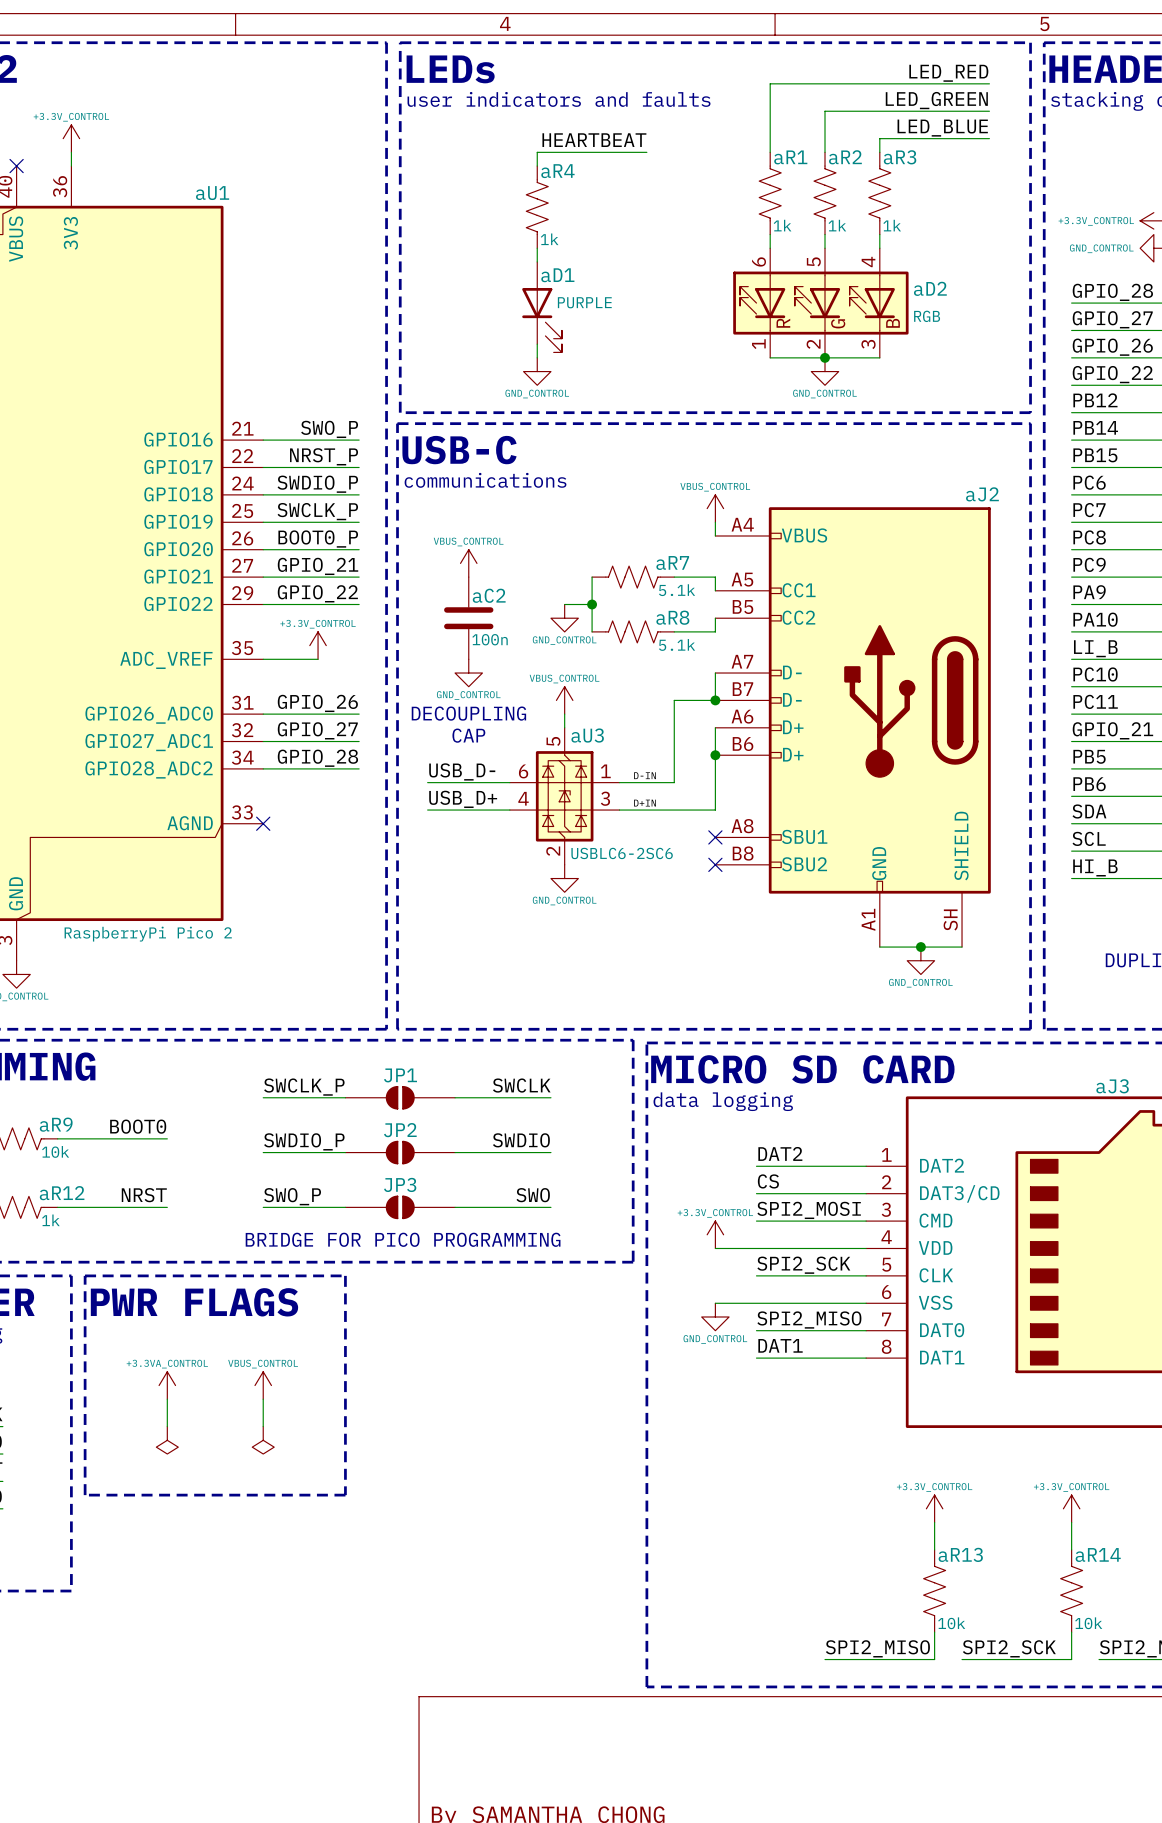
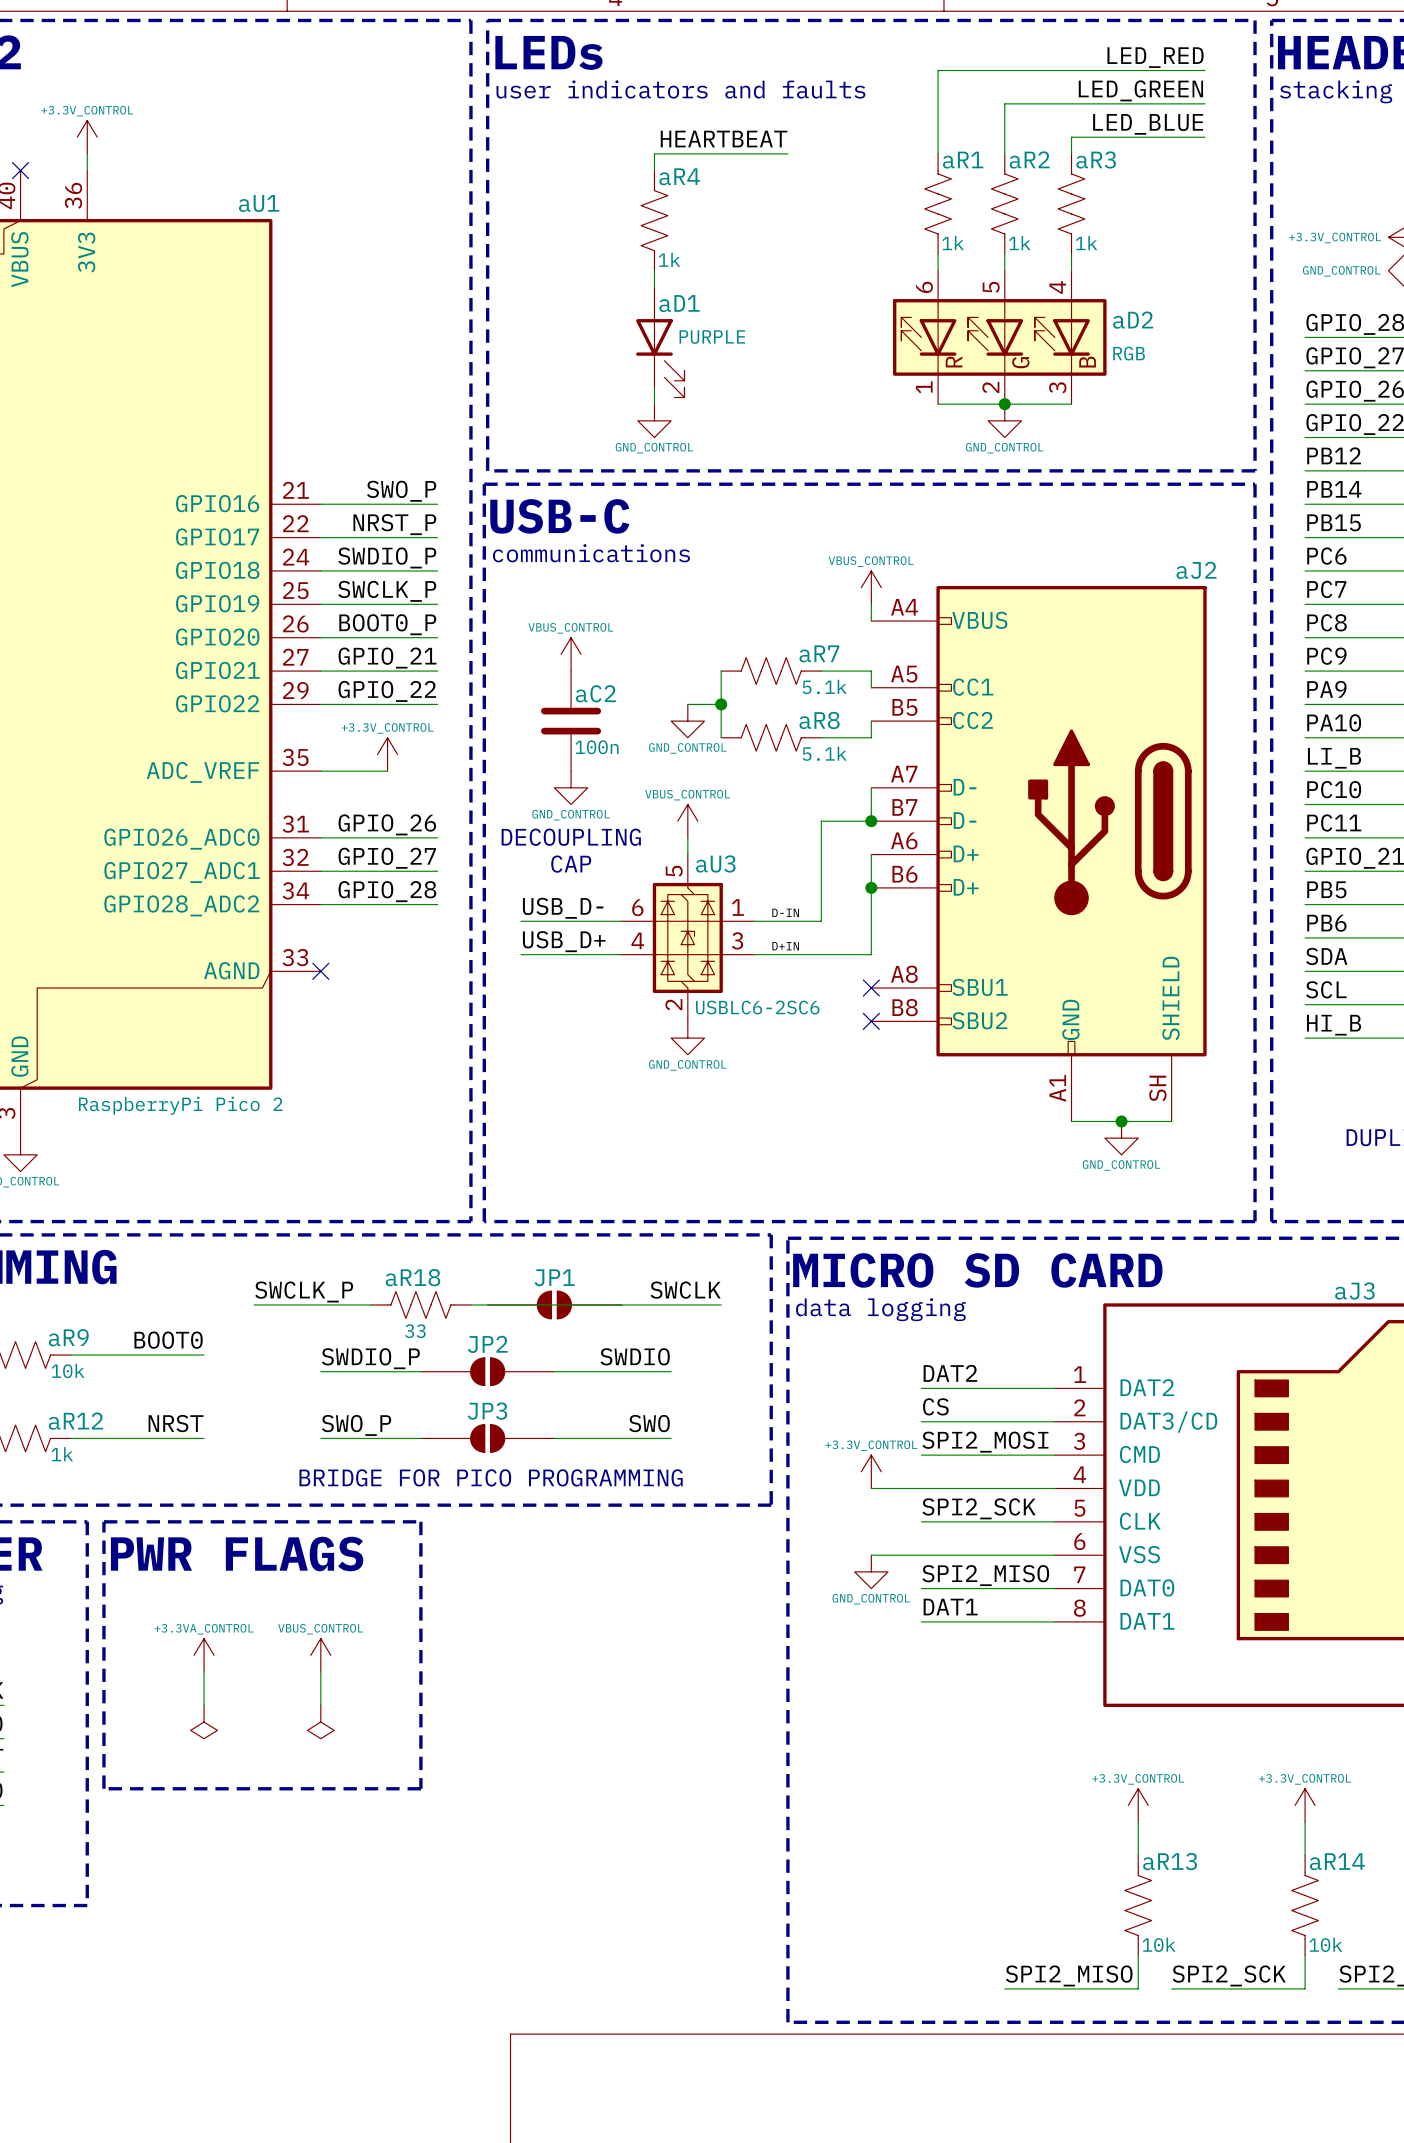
label position: SWCLK (521, 1085) -> SWCLK (685, 1290)
label position: SWCLK_P (304, 1087) -> SWCLK_P (304, 1291)
wire: none -> (254, 1304) (320, 1304)
wire: (304, 1097) (345, 1097) -> (671, 1304) (721, 1304)
aR18: none -> 33 (420, 1304)
JP1 position: (400, 1097) -> (554, 1304)

